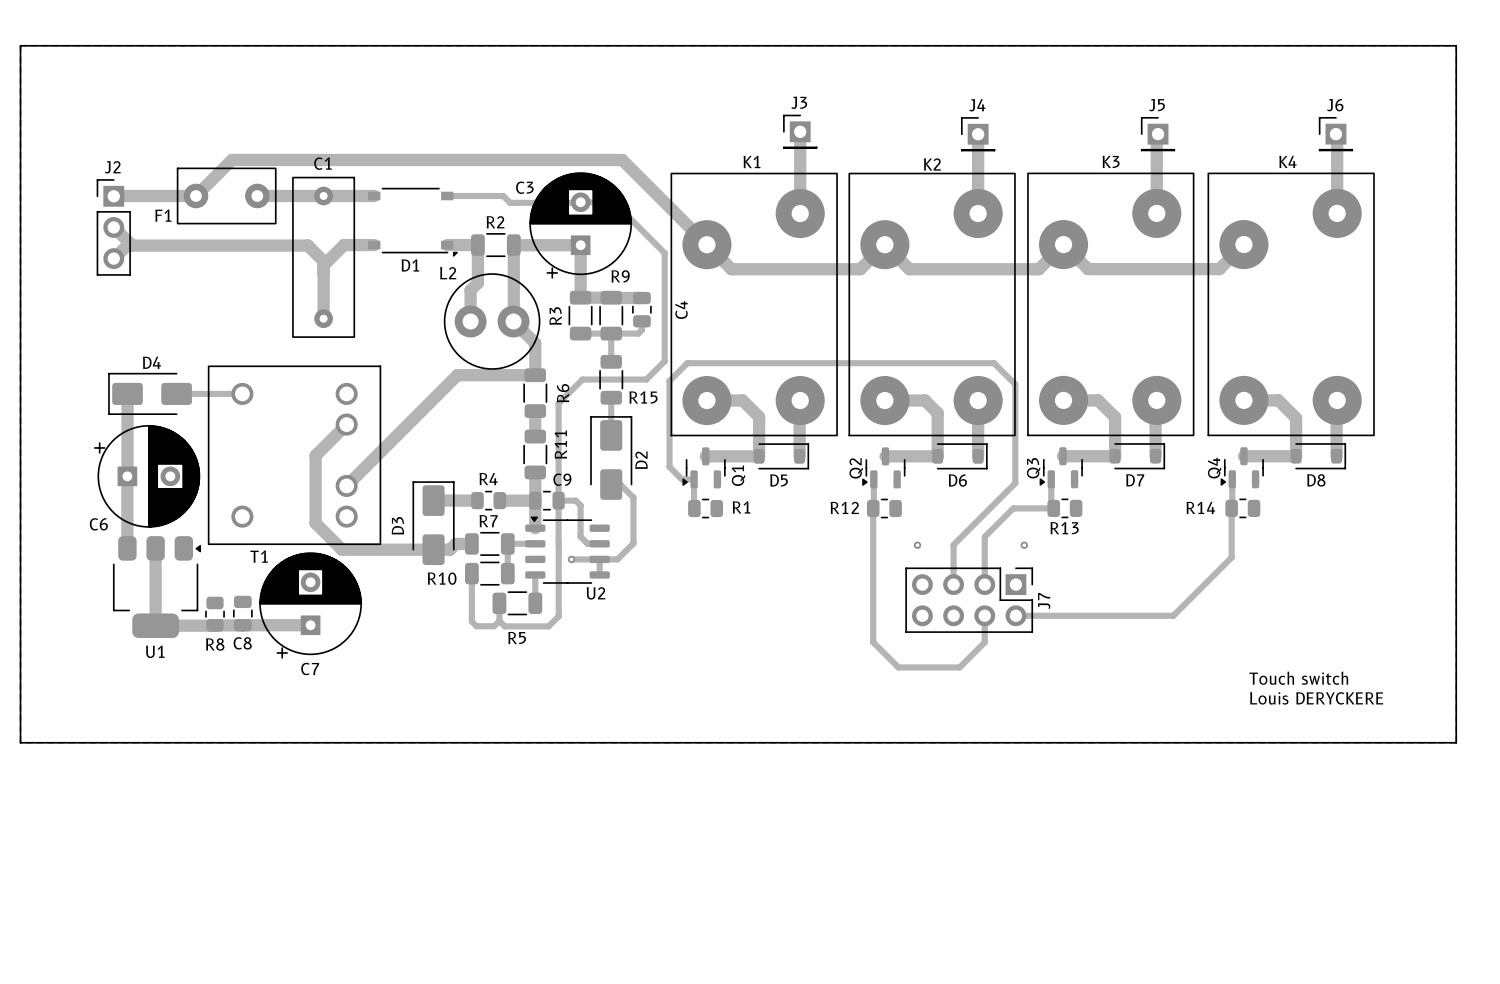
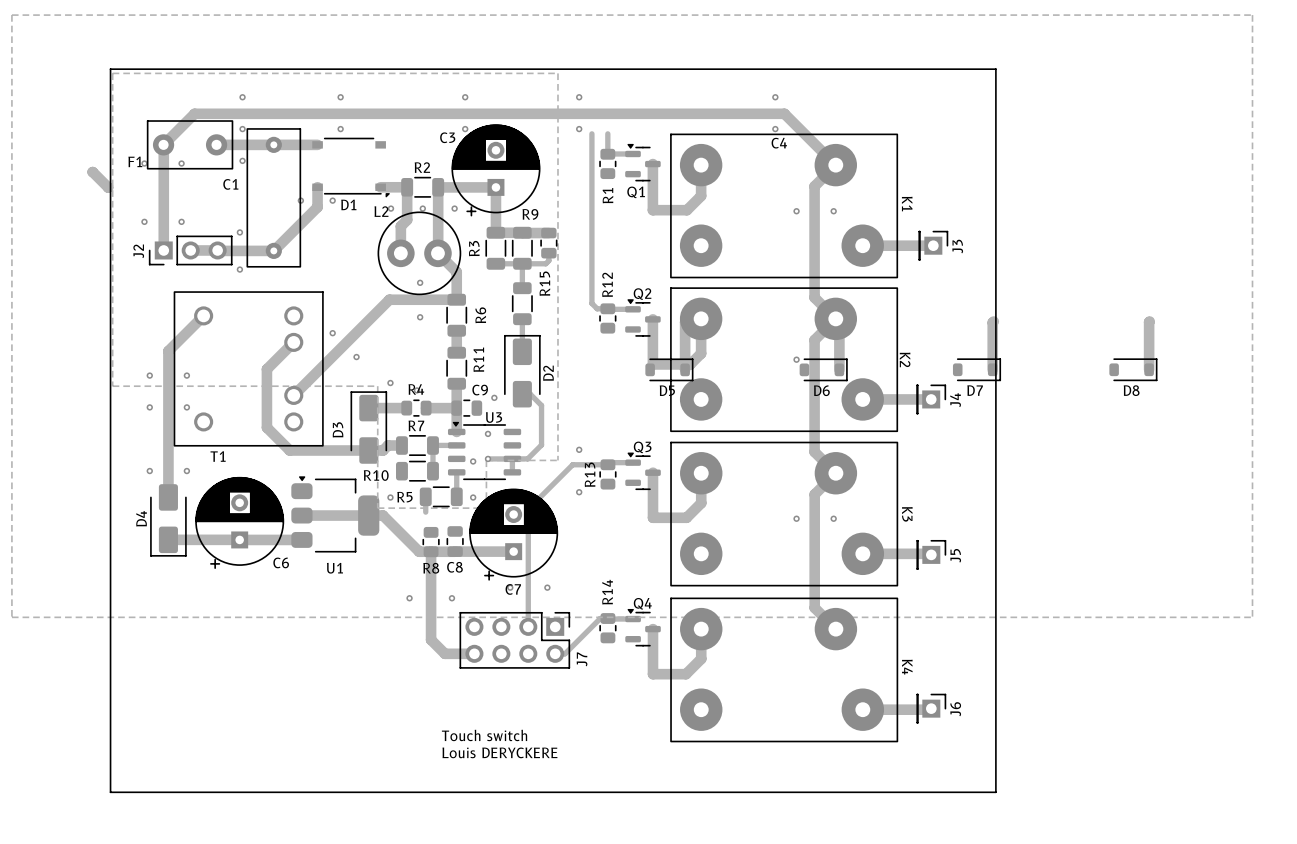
board edge: (20, 45) (1456, 45) (1456, 742) (20, 742) (20, 45) -> (110, 69) (110, 792) (995, 792) (995, 69) (110, 69)
zone outline: none -> (112, 73) (112, 386) (377, 386) (377, 508) (486, 508) (486, 460) (557, 460) (557, 73) (112, 73)
track: (800, 131) (800, 213) -> none
J3 rotation: 0° (800, 131) -> 90° clockwise (933, 245)
J3 position: (800, 131) -> (933, 245)
track: (978, 134) (978, 213) -> none
J4 rotation: 0° (978, 134) -> 90° clockwise (931, 399)
J4 position: (978, 134) -> (931, 399)
track: (1158, 134) (1156, 213) -> none
J5 rotation: 0° (1158, 134) -> 90° clockwise (931, 554)
J5 position: (1158, 134) -> (931, 554)
track: (1335, 134) (1337, 213) -> none
J6 rotation: 0° (1335, 134) -> 90° clockwise (931, 708)
J6 position: (1335, 134) -> (931, 708)
via: none -> (242, 97)
via: none -> (340, 97)
via: none -> (465, 97)
via: none -> (579, 97)
via: none -> (775, 97)
track: (622, 160) (731, 269) (860, 269) (884, 244) (909, 269) (1038, 269) (1063, 244) (1088, 269) (1219, 269) (1243, 244) -> (531, 113) (784, 113) (835, 165) (814, 186) (814, 297) (835, 318) (814, 340) (814, 451) (835, 473) (814, 494) (814, 607) (835, 629)
C1 name position: C1 (322, 163) -> C1 (230, 184)
via: none -> (242, 129)
via: none -> (340, 129)
via: none -> (465, 129)
via: none -> (579, 129)
via: none -> (775, 129)
track: none -> (591, 133) (591, 303) (597, 308) (633, 309)
track: none -> (607, 133) (607, 154) (633, 153)
track: (195, 195) (113, 196) -> (163, 144) (163, 250)
track: (447, 195) (503, 195) (510, 202) (613, 202) (664, 253) (664, 361) (646, 379) (582, 379) (558, 403) (558, 543) -> none
via: none -> (242, 160)
via: none -> (144, 163)
via: none -> (181, 163)
track: none -> (652, 164) (652, 210) (686, 210) (701, 196) (701, 165)
J2 rotation: 0° (113, 227) -> 90° counterclockwise (190, 250)
J2 position: (113, 227) -> (190, 250)
track: (374, 245) (343, 245) (323, 265) -> (317, 187) (317, 207) (273, 250) (190, 250)
track: (113, 258) (127, 245) (307, 245) (323, 261) (323, 318) -> none
via: none -> (300, 200)
via: none -> (332, 200)
via: none -> (390, 208)
via: none -> (422, 208)
via: none -> (454, 208)
via: none -> (796, 211)
via: none -> (833, 211)
via: none -> (144, 221)
via: none -> (181, 221)
via: none -> (239, 232)
K1 rotation: 0° (754, 304) -> 90° clockwise (784, 205)
K1 position: (754, 304) -> (784, 205)
K2 rotation: 0° (932, 304) -> 90° clockwise (784, 359)
K3 rotation: 0° (1110, 304) -> 90° clockwise (784, 514)
K3 position: (1110, 304) -> (784, 514)
K4 rotation: 0° (1291, 304) -> 90° clockwise (784, 669)
K4 position: (1291, 304) -> (784, 669)
C4 name rotation: 0° (681, 310) -> 90° clockwise (779, 143)
C4 name position: C4 (681, 310) -> C4 (779, 143)
track: none -> (862, 245) (933, 245)
via: none -> (239, 269)
via: none -> (420, 282)
track: (127, 393) (127, 476) -> none
D4 rotation: 0° (150, 393) -> 90° counterclockwise (168, 520)
D4 position: (150, 393) -> (168, 520)
track: (176, 393) (242, 393) -> (168, 497) (168, 351) (203, 315)
via: none -> (420, 317)
R15 name rotation: 0° (643, 397) -> 90° counterclockwise (544, 283)
track: none -> (701, 318) (701, 353) (690, 364) (652, 364) (652, 319)
track: (706, 400) (742, 400) (759, 416) (759, 456) (705, 456) -> none
track: (884, 400) (925, 400) (937, 413) (937, 456) (885, 456) -> none
track: (1063, 400) (1098, 400) (1115, 417) (1115, 456) (1062, 456) -> none
track: (1243, 400) (1278, 400) (1296, 418) (1296, 456) (1243, 456) -> none
via: none -> (332, 333)
via: none -> (356, 357)
via: none -> (796, 359)
via: none -> (149, 375)
via: none -> (186, 375)
Q1 rotation: 0° (704, 467) -> 90° clockwise (642, 162)
Q1 position: (704, 467) -> (642, 162)
Q2 rotation: 0° (883, 467) -> 90° clockwise (642, 317)
Q2 position: (883, 467) -> (642, 317)
Q3 rotation: 0° (1061, 467) -> 90° clockwise (643, 471)
Q3 position: (1061, 467) -> (643, 471)
Q4 rotation: 0° (1242, 467) -> 90° clockwise (643, 627)
Q4 position: (1242, 467) -> (643, 627)
via: none -> (390, 383)
track: (127, 476) (127, 548) -> none
C6 rotation: 0° (147, 476) -> 90° counterclockwise (239, 522)
C6 position: (147, 476) -> (239, 522)
track: (873, 479) (873, 642) (898, 667) (959, 667) (984, 642) (984, 615) -> none
track: (1051, 479) (1051, 505) (1053, 508) (1013, 508) (984, 536) (984, 584) -> none
track: (1232, 479) (1231, 557) (1173, 615) (1015, 615) -> none
via: none -> (416, 390)
via: none -> (494, 397)
track: none -> (862, 399) (931, 399)
via: none -> (149, 407)
via: none -> (186, 407)
track: (558, 500) (575, 500) (580, 505) (580, 536) (587, 543) (599, 543) -> none
track: (694, 508) (694, 479) (681, 479) (669, 467) (669, 380) (687, 363) (994, 363) (1015, 384) (1015, 483) (953, 544) (953, 584) -> none
R1 rotation: 0° (705, 508) -> 90° clockwise (607, 163)
R1 position: (705, 508) -> (607, 163)
R12 rotation: 0° (884, 508) -> 90° clockwise (607, 318)
R12 position: (884, 508) -> (607, 318)
R13 rotation: 0° (1064, 508) -> 90° clockwise (607, 474)
R13 position: (1064, 508) -> (607, 474)
R14 rotation: 0° (1242, 508) -> 90° clockwise (607, 628)
R14 position: (1242, 508) -> (607, 628)
via: none -> (488, 433)
track: (558, 543) (558, 616) (548, 626) (504, 626) (499, 621) (494, 626) (476, 626) (471, 621) (471, 573) -> none
via: (917, 545) -> none
via: (1024, 545) -> none
track: (155, 548) (155, 625) (242, 625) -> none
via: none -> (579, 449)
via: none -> (473, 461)
track: none -> (633, 462) (572, 464) (528, 509) (528, 626)
via: none -> (149, 471)
via: none -> (186, 471)
track: none -> (652, 472) (652, 517) (686, 517) (701, 503) (701, 473)
U1 rotation: 0° (157, 587) -> 90° counterclockwise (335, 514)
U1 position: (157, 587) -> (335, 514)
U2 name: U2 (596, 593) -> U3 (494, 417)
via: none -> (579, 492)
J7 position: (969, 600) -> (514, 640)
J7 name position: J7 (1044, 600) -> J7 (582, 659)
via: none -> (390, 497)
via: none -> (473, 497)
C7 position: (310, 605) -> (513, 534)
C8 position: (242, 613) -> (455, 541)
R8 position: (215, 614) -> (431, 542)
track: none -> (301, 515) (383, 515) (419, 551) (455, 551)
track: (242, 625) (310, 625) -> (455, 551) (513, 551)
via: none -> (796, 518)
via: none -> (833, 518)
R5 name position: R5 (517, 638) -> R5 (404, 497)
track: none -> (168, 539) (239, 539)
track: none -> (239, 539) (301, 539)
track: none -> (431, 551) (431, 639) (444, 653) (474, 653)
track: none -> (862, 553) (931, 554)
text: Touch switch (1298, 678) -> none
text: Louis DERYCKERE (1316, 698) -> none
via: none -> (510, 587)
via: none -> (547, 587)
via: none -> (409, 598)
via: none -> (451, 598)
track: none -> (633, 619) (600, 618) (564, 653) (555, 653)
track: none -> (652, 629) (652, 674) (685, 674) (701, 658) (701, 629)
track: none -> (931, 708) (862, 709)
text: none -> Touch switch (484, 735)
text: none -> Louis DERYCKERE (499, 752)

